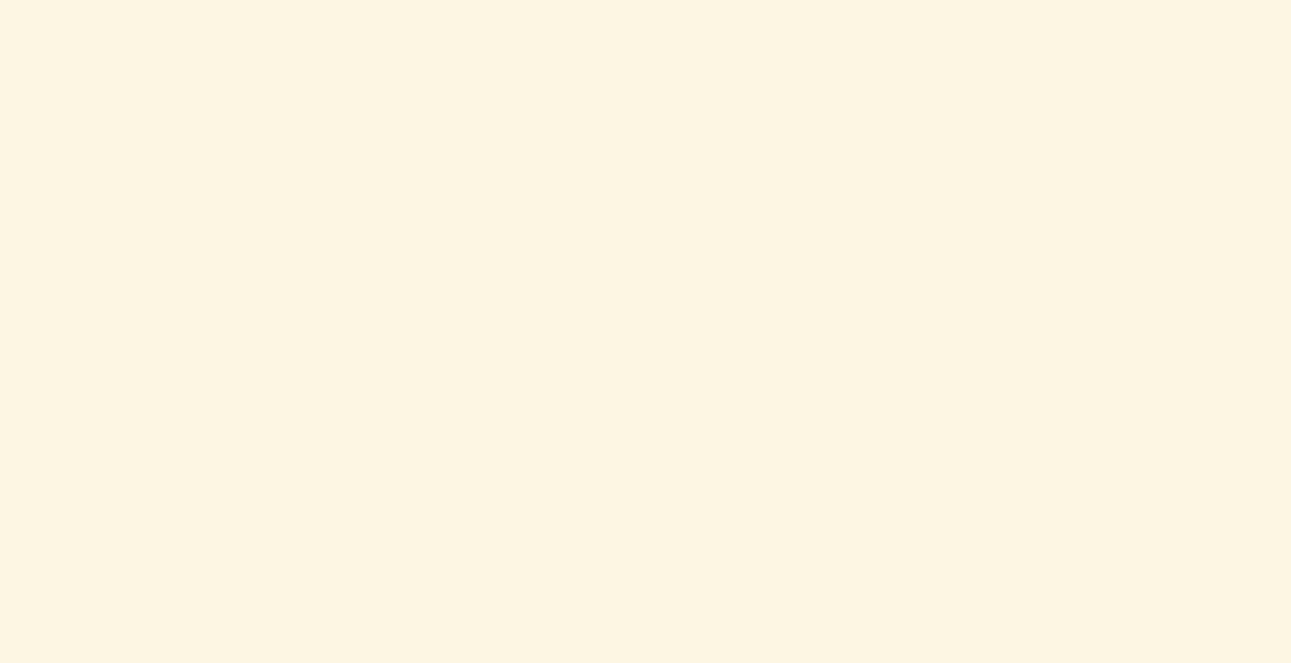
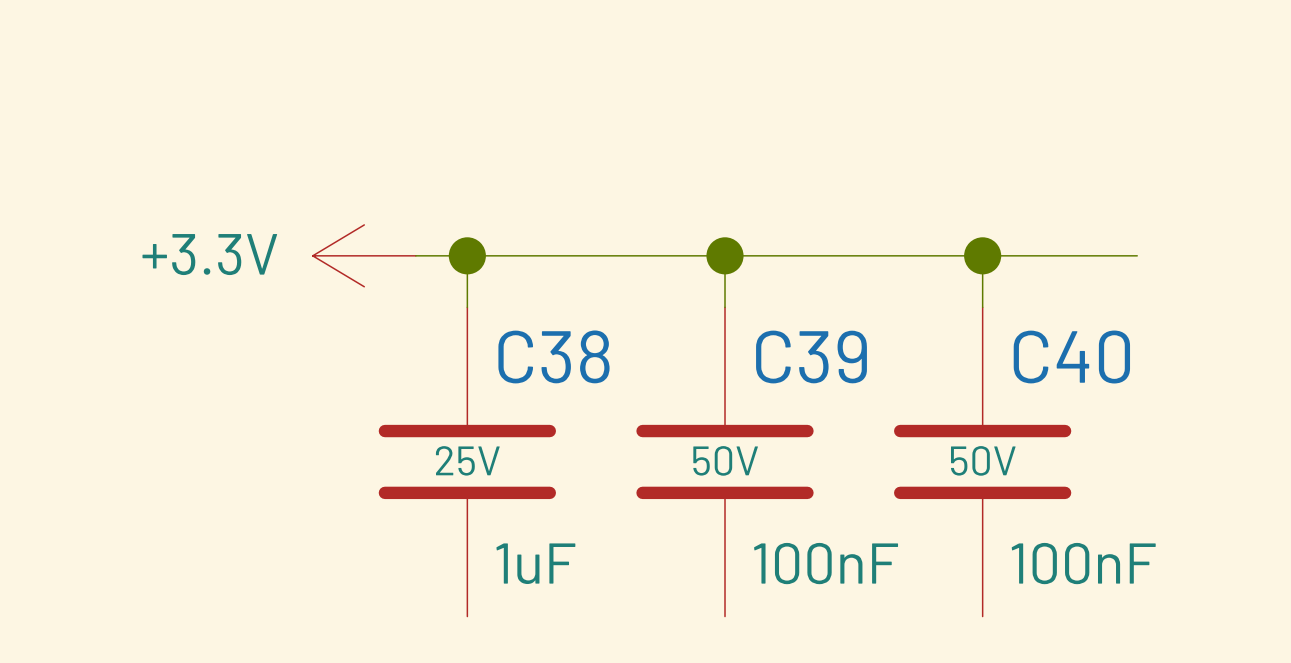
power symbol: none -> +3.3V (364, 255)
wire: none -> (415, 255) (1137, 255)
wire: none -> (467, 255) (467, 307)
junction: none -> (467, 255)
wire: none -> (725, 255) (725, 307)
junction: none -> (725, 255)
wire: none -> (982, 255) (982, 307)
junction: none -> (982, 255)
C38: none -> 1uF (467, 461)
C39: none -> 100nF (725, 461)
C40: none -> 100nF (982, 461)

